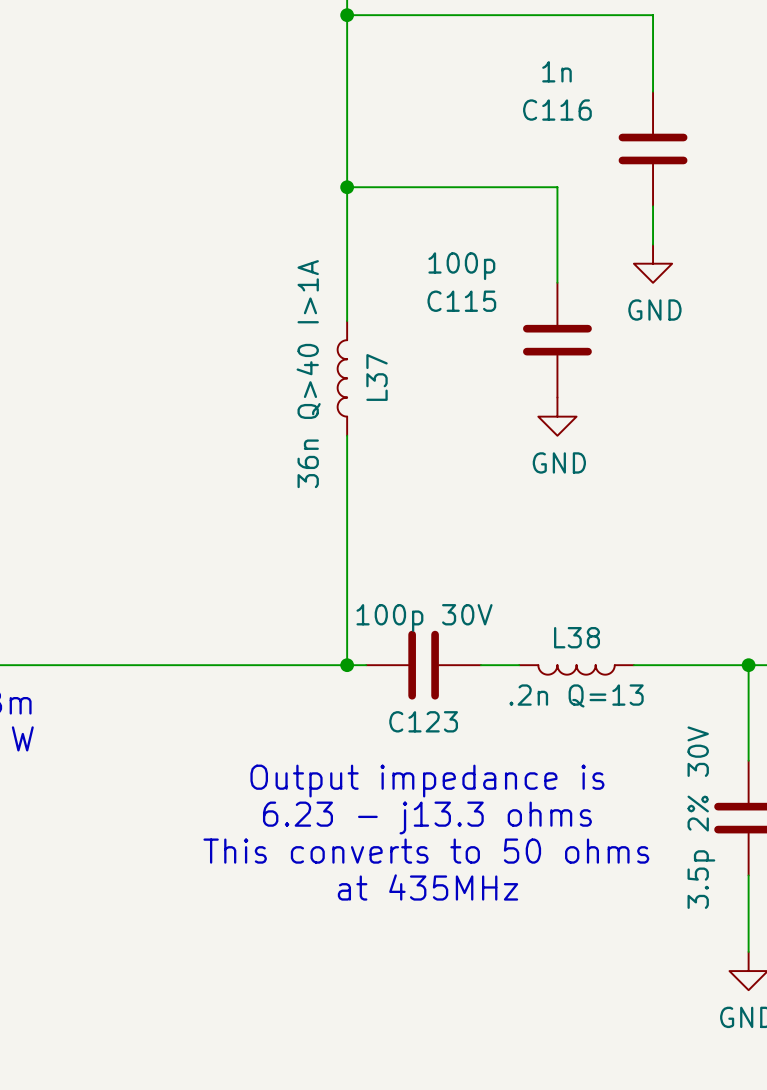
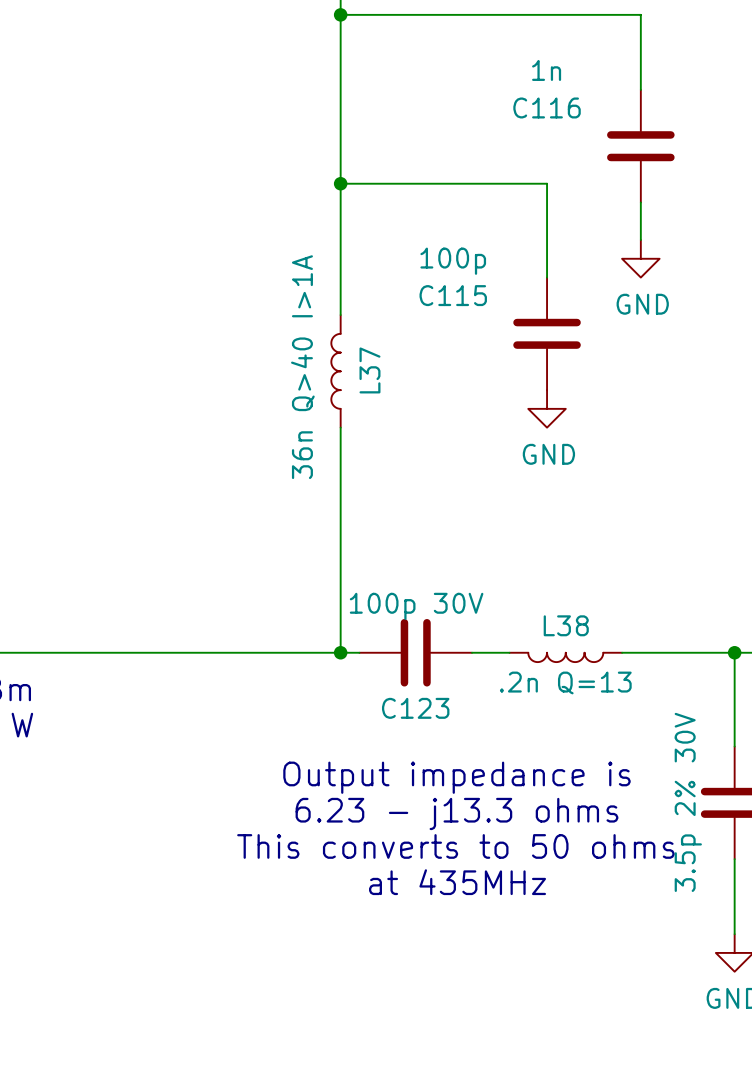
text position: Output impedance is (427, 781) -> Output impedance is (456, 777)
text position: 6.23 - j13.3 ohms (427, 817) -> 6.23 - j13.3 ohms (456, 813)
text position: This converts to 50 ohms (426, 851) -> This converts to 50 ohms (455, 846)
text position: at 435MHz (427, 887) -> at 435MHz (457, 882)

